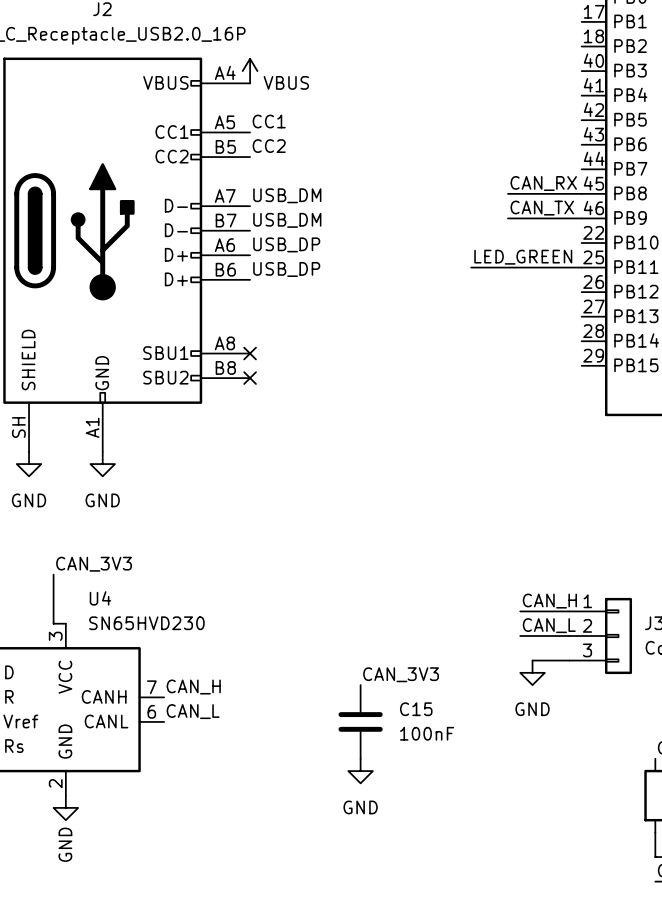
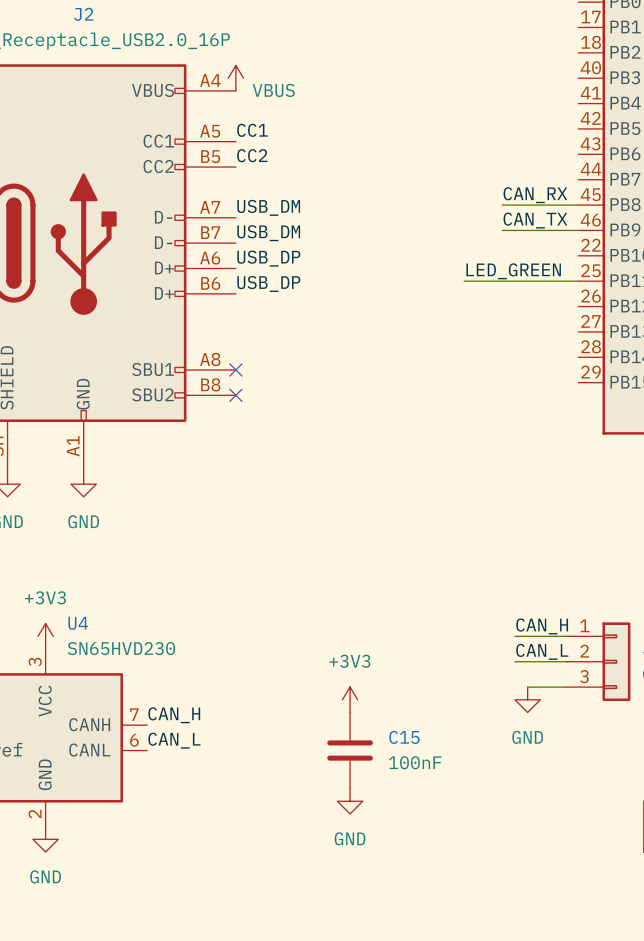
label: CAN_3V3 (94, 564) -> none
wire: (53, 574) (53, 623) (65, 623) -> none
power symbol: none -> +3V3 (45, 636)
power symbol: none -> +3V3 (350, 699)
label: CAN_3V3 (401, 674) -> none
power symbol text rotation: 0° (65, 844) -> 90° clockwise (45, 876)

